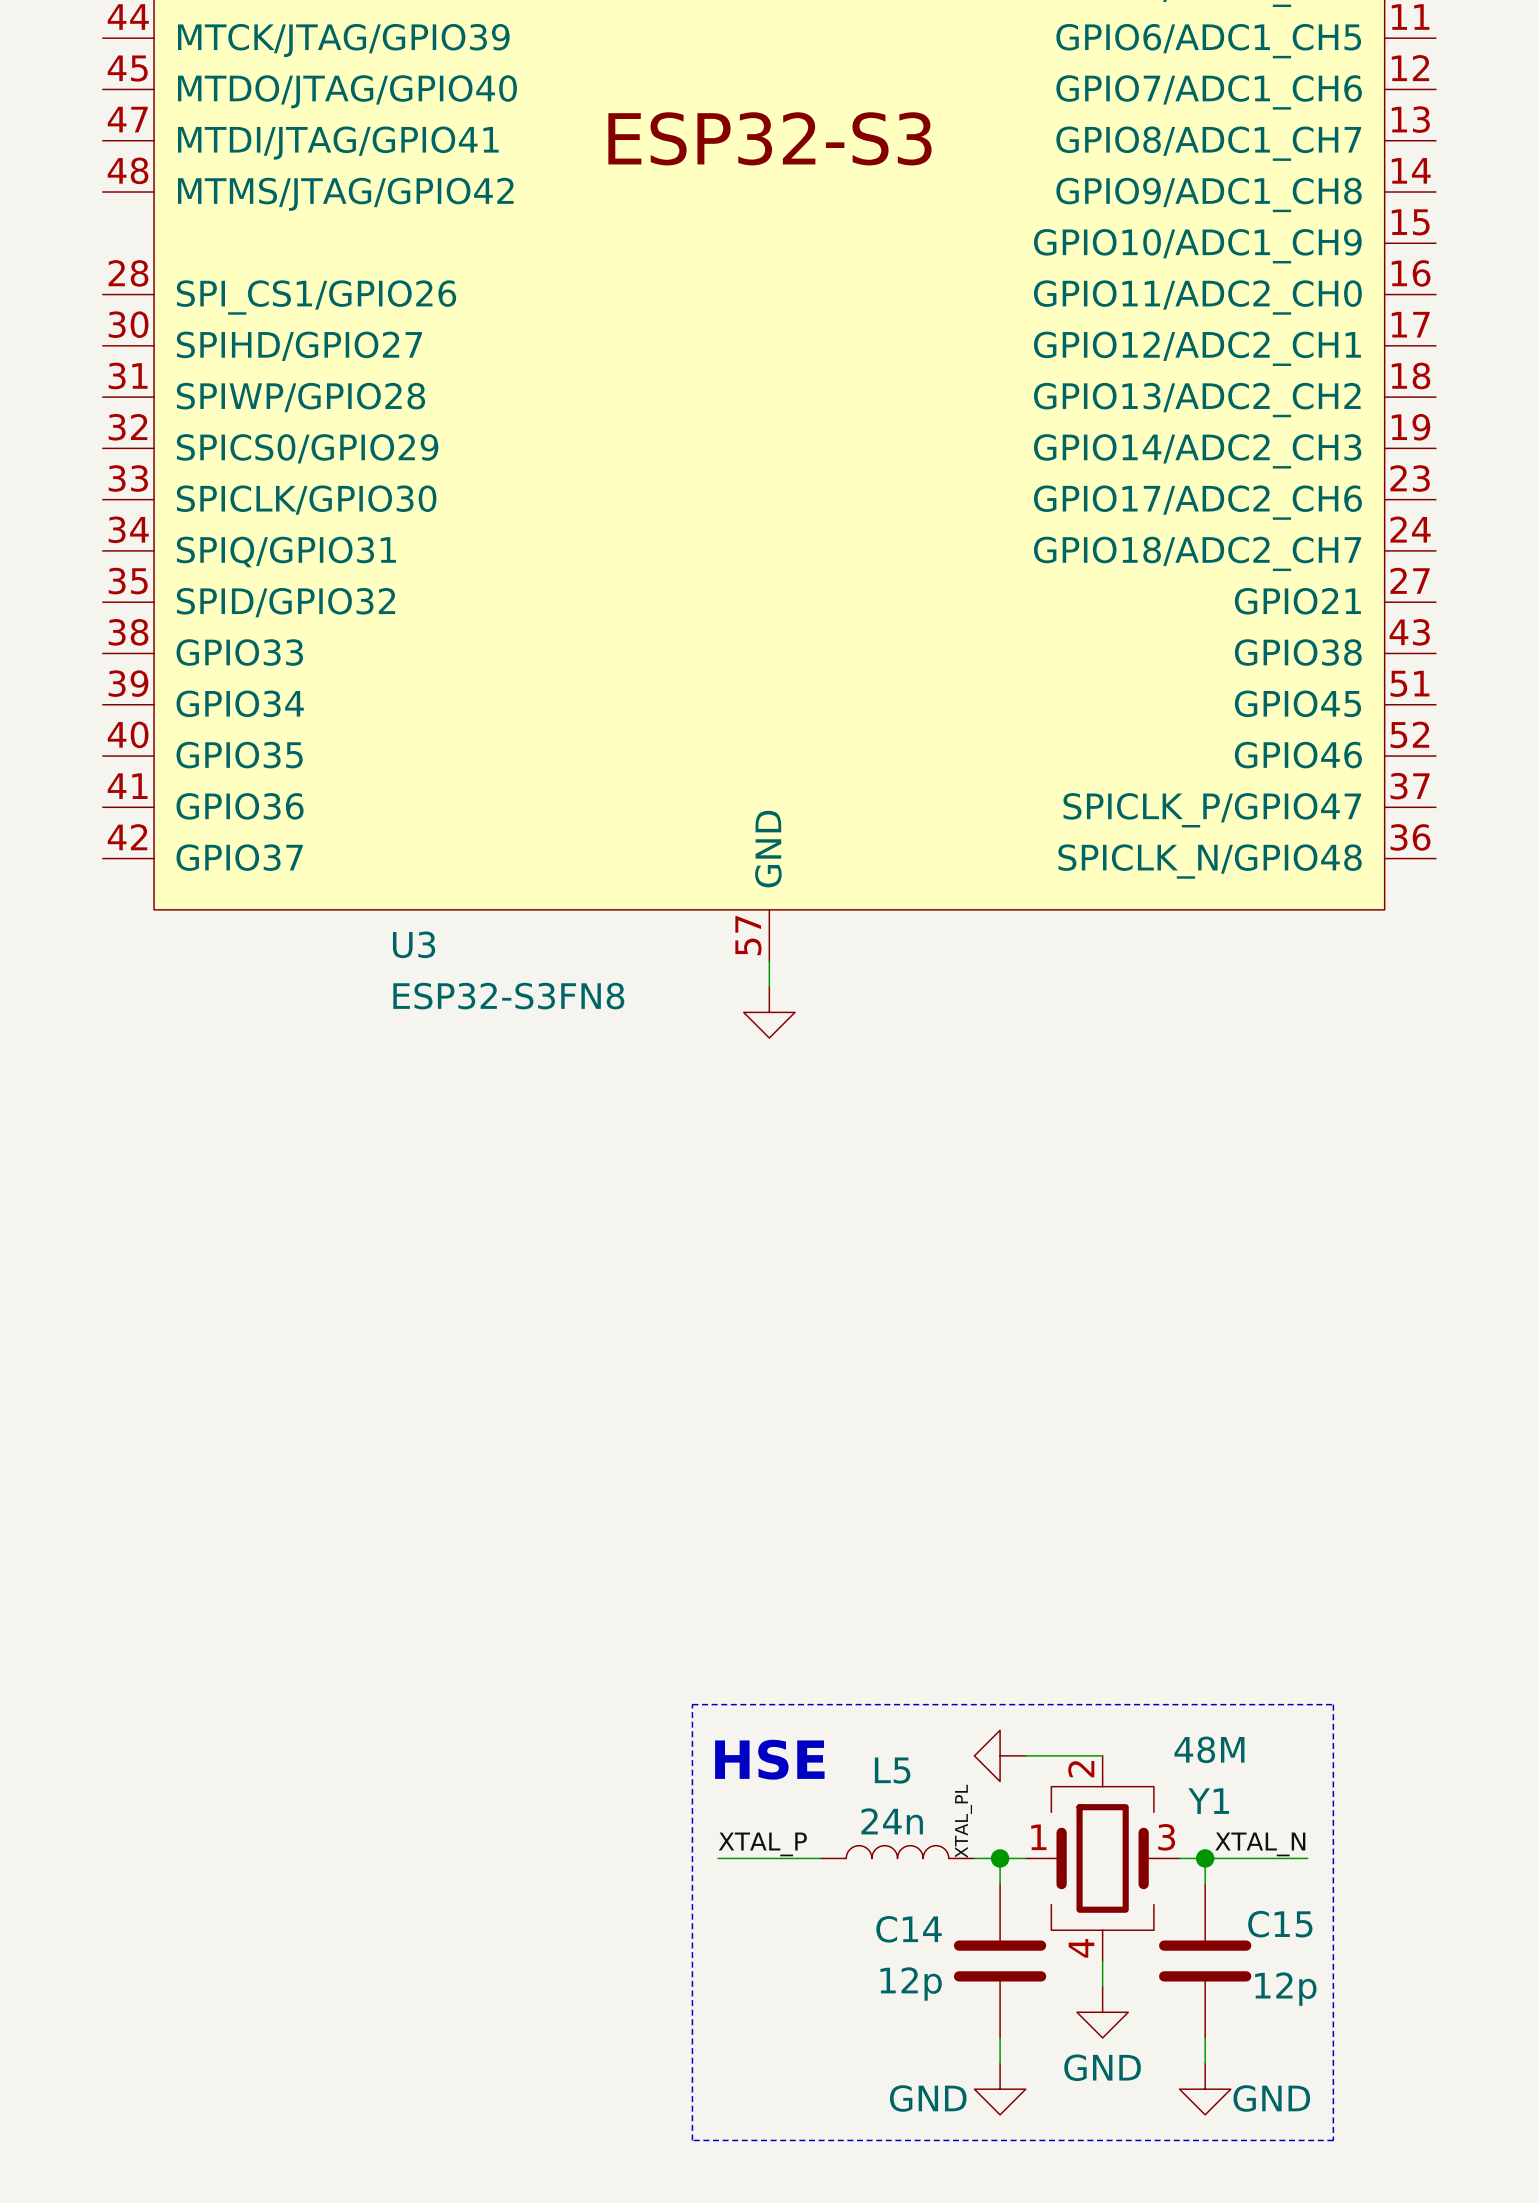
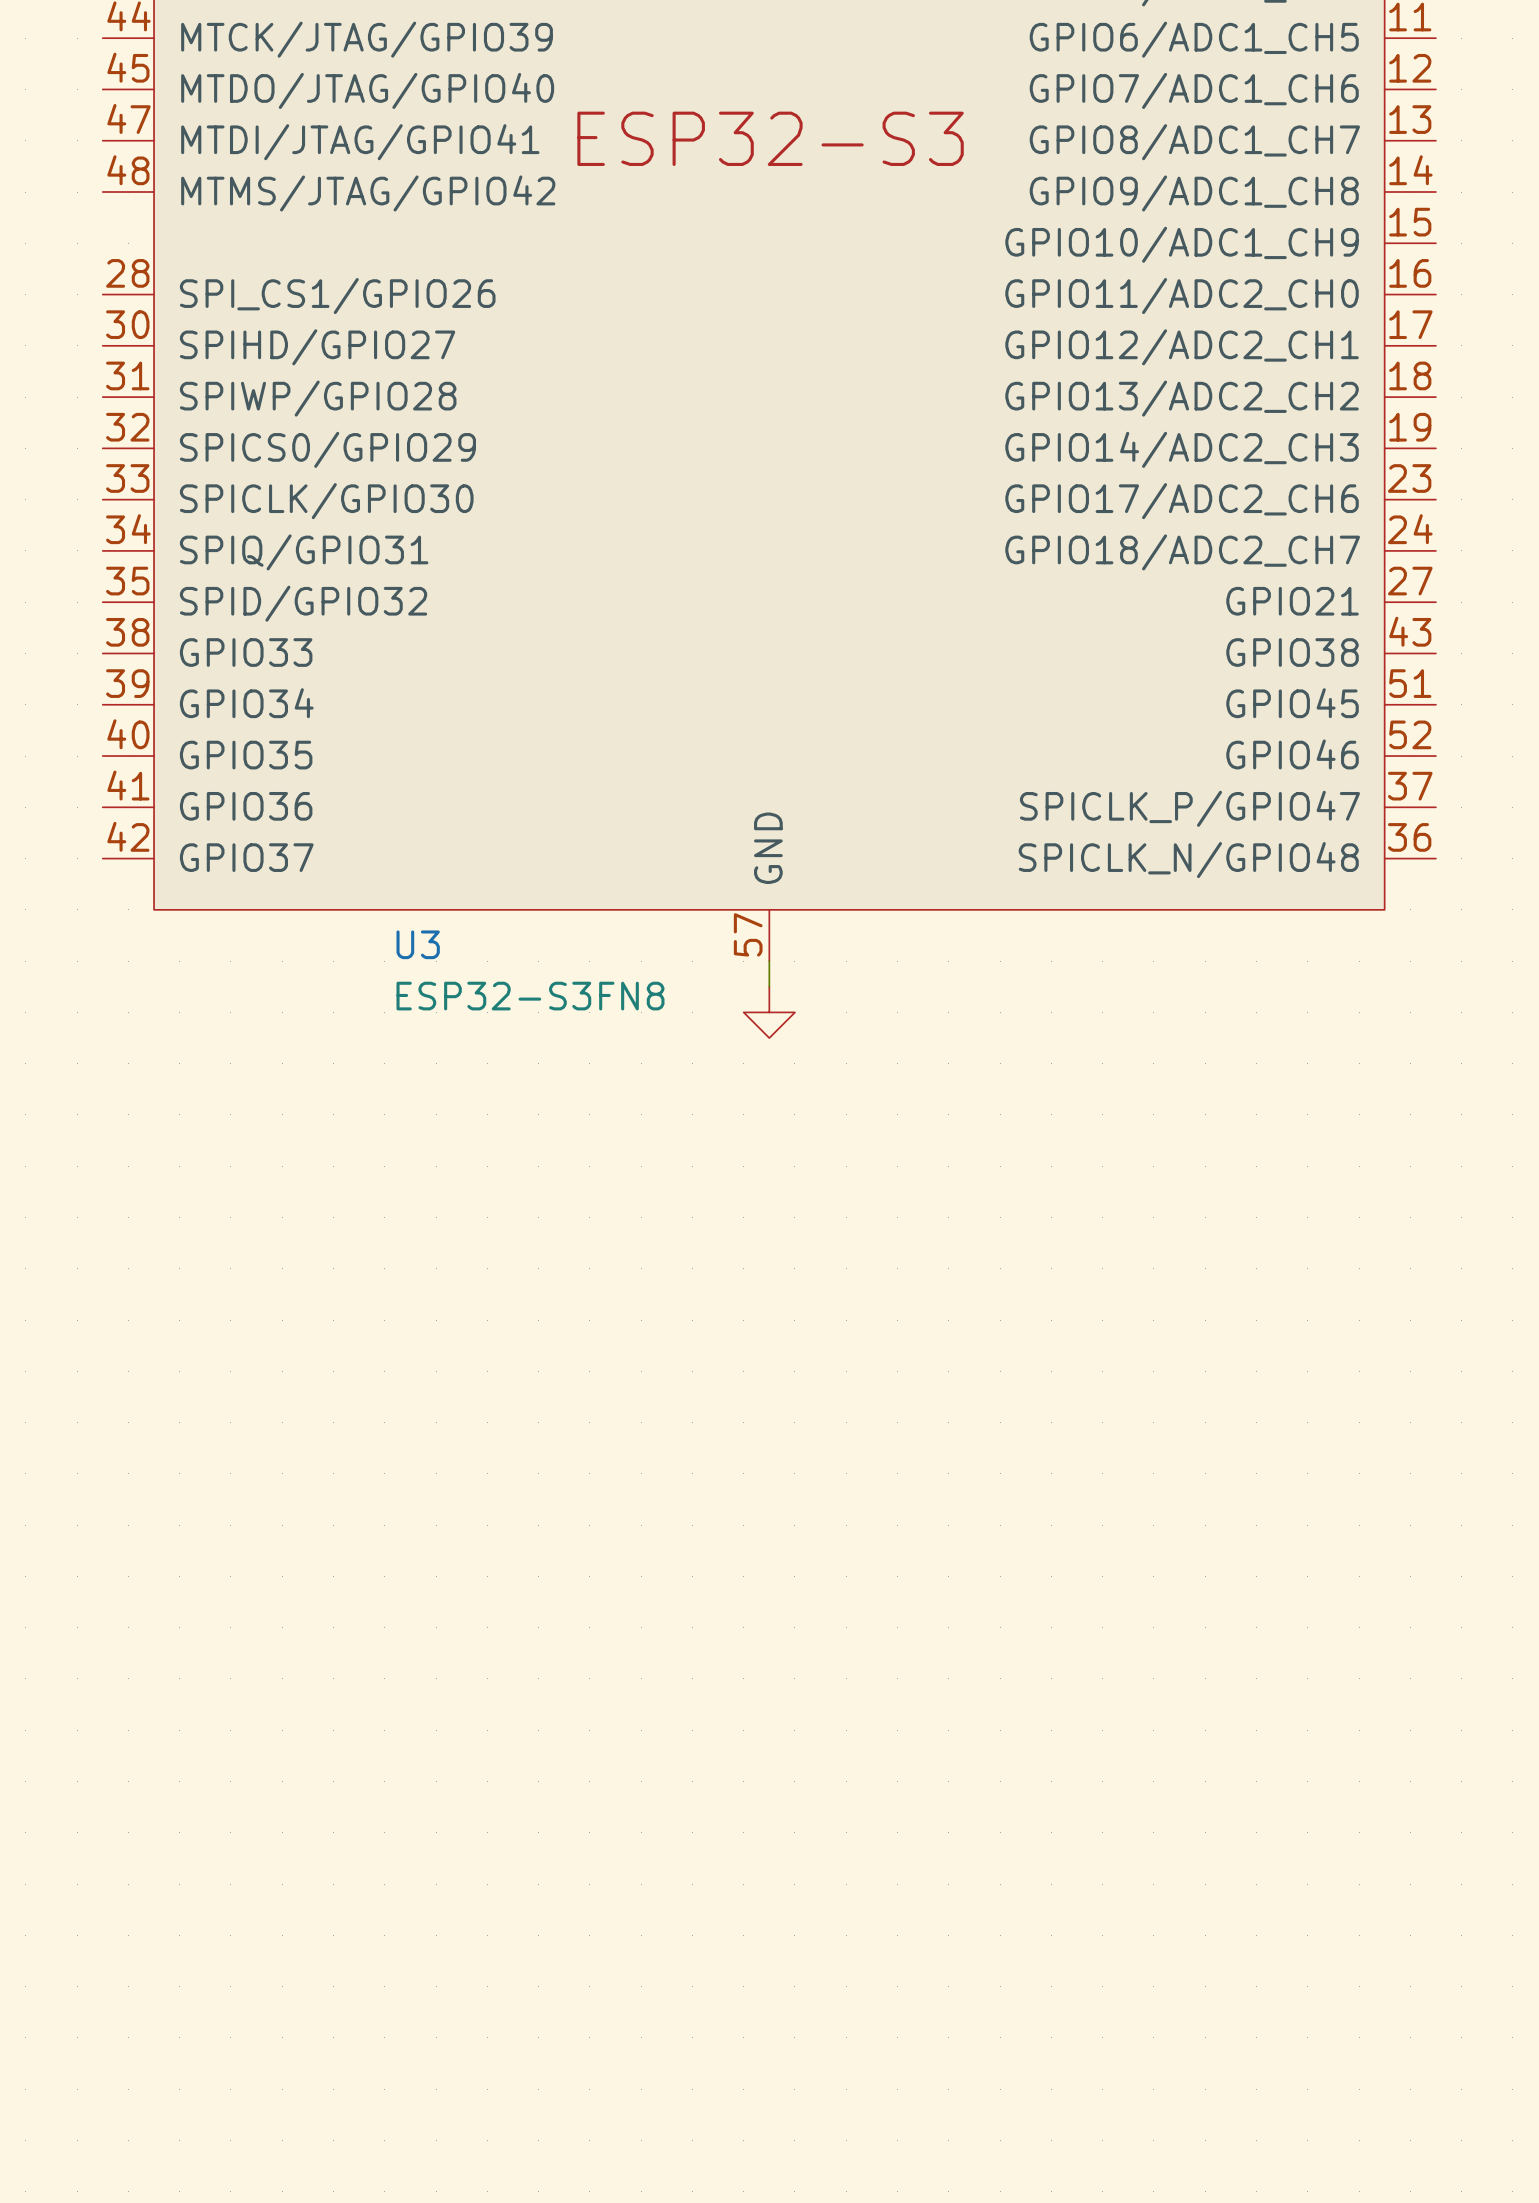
line: (692, 1704) (1333, 1704) (1333, 2140) (692, 2140) (692, 1704) -> none
power symbol: (1000, 1755) -> none
wire: (1025, 1755) (1102, 1755) -> none
text: HSE (769, 1759) -> none
label: XTAL_PL (963, 1821) -> none
label: XTAL_P (762, 1844) -> none
label: XTAL_N (1260, 1844) -> none
L5: 24n (897, 1852) -> none
wire: (718, 1858) (820, 1858) -> none
wire: (974, 1858) (1025, 1858) -> none
wire: (1000, 1858) (1000, 1884) -> none
junction: (1000, 1858) -> none
Y1: 48M (1102, 1858) -> none
wire: (1179, 1858) (1307, 1858) -> none
wire: (1205, 1858) (1205, 1884) -> none
junction: (1205, 1858) -> none
C14: 12p (1000, 1961) -> none
wire: (1102, 1961) (1102, 1986) -> none
C15: 12p (1205, 1961) -> none
power symbol: GND (1102, 2012) -> none
wire: (1000, 2037) (1000, 2063) -> none
wire: (1205, 2037) (1205, 2063) -> none
power symbol: GND (1000, 2089) -> none
power symbol: GND (1205, 2089) -> none

